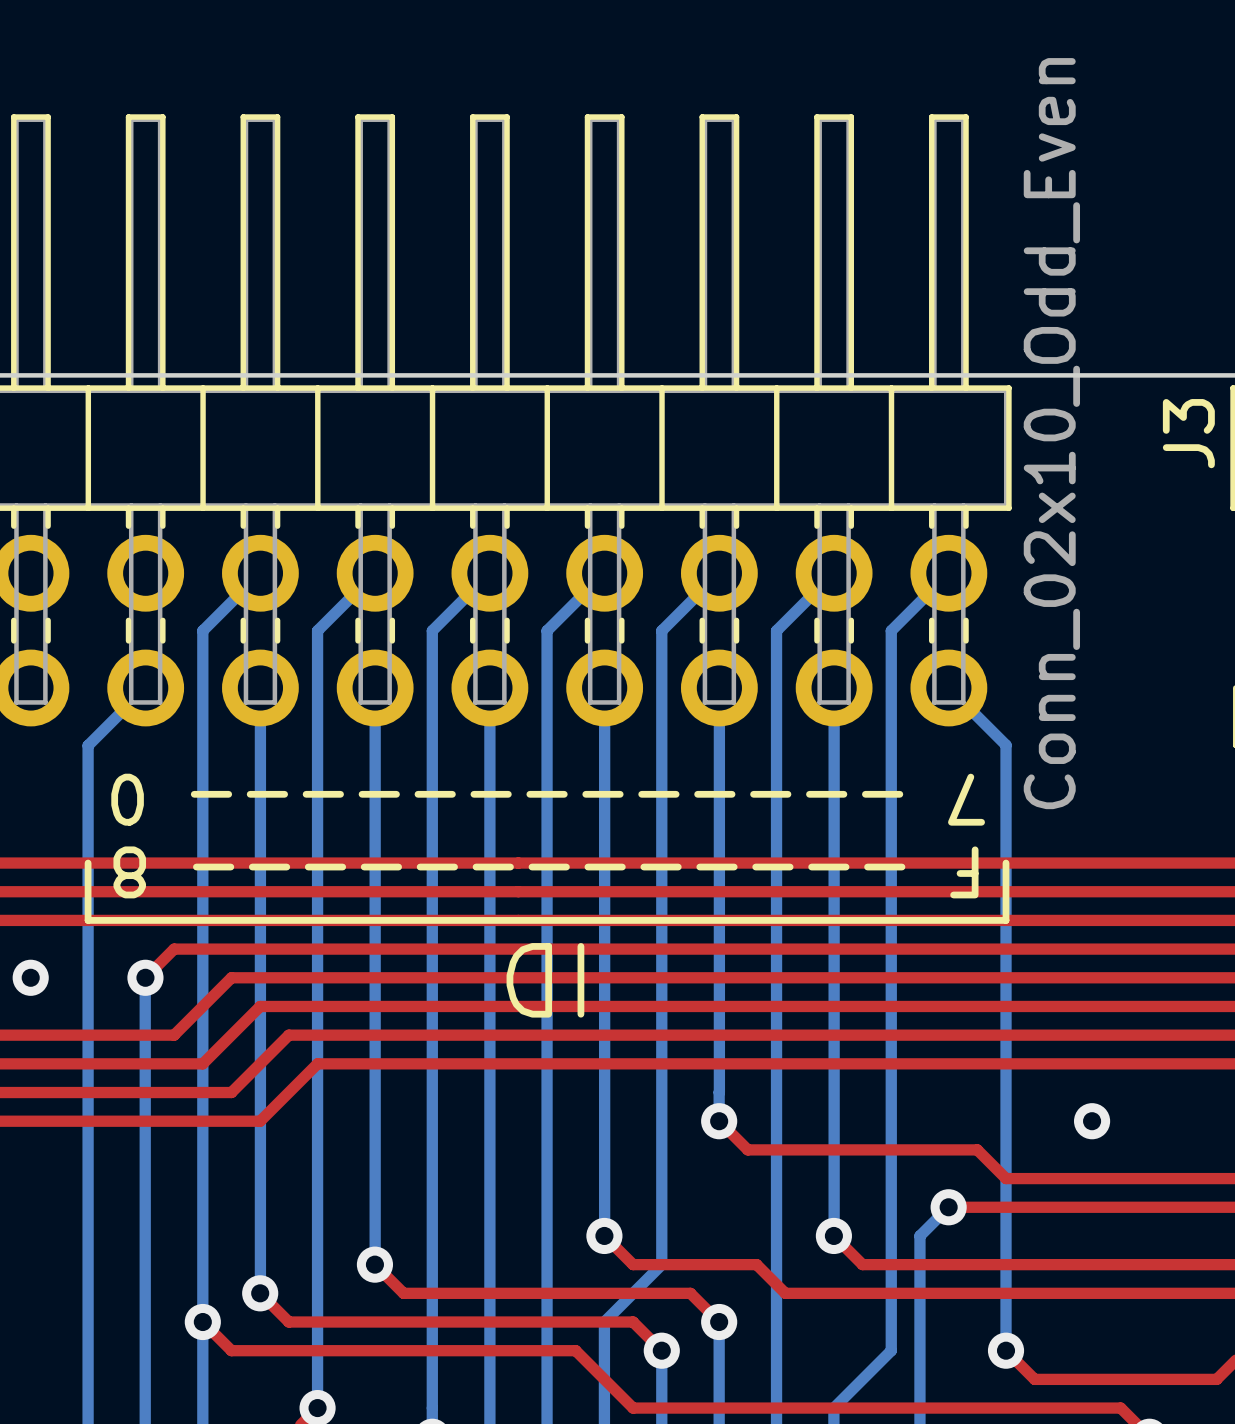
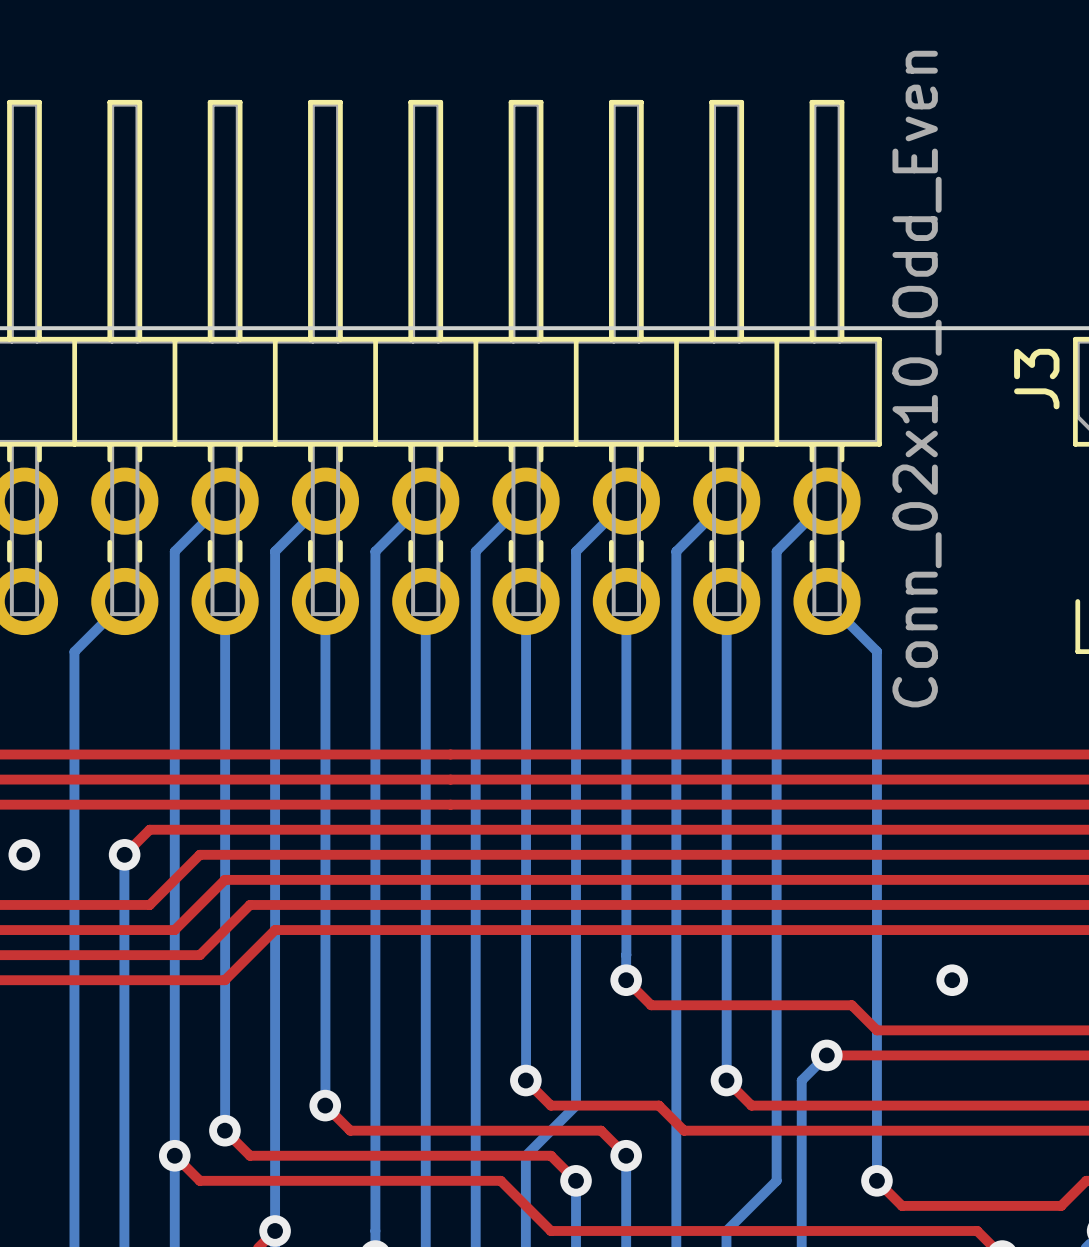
text: 7 ------------- 0 (548, 799) -> none
line: (88, 863) (88, 920) (1006, 920) (1006, 863) -> none
text: F ------------- 8 (545, 872) -> none
text: ID (545, 980) -> none

